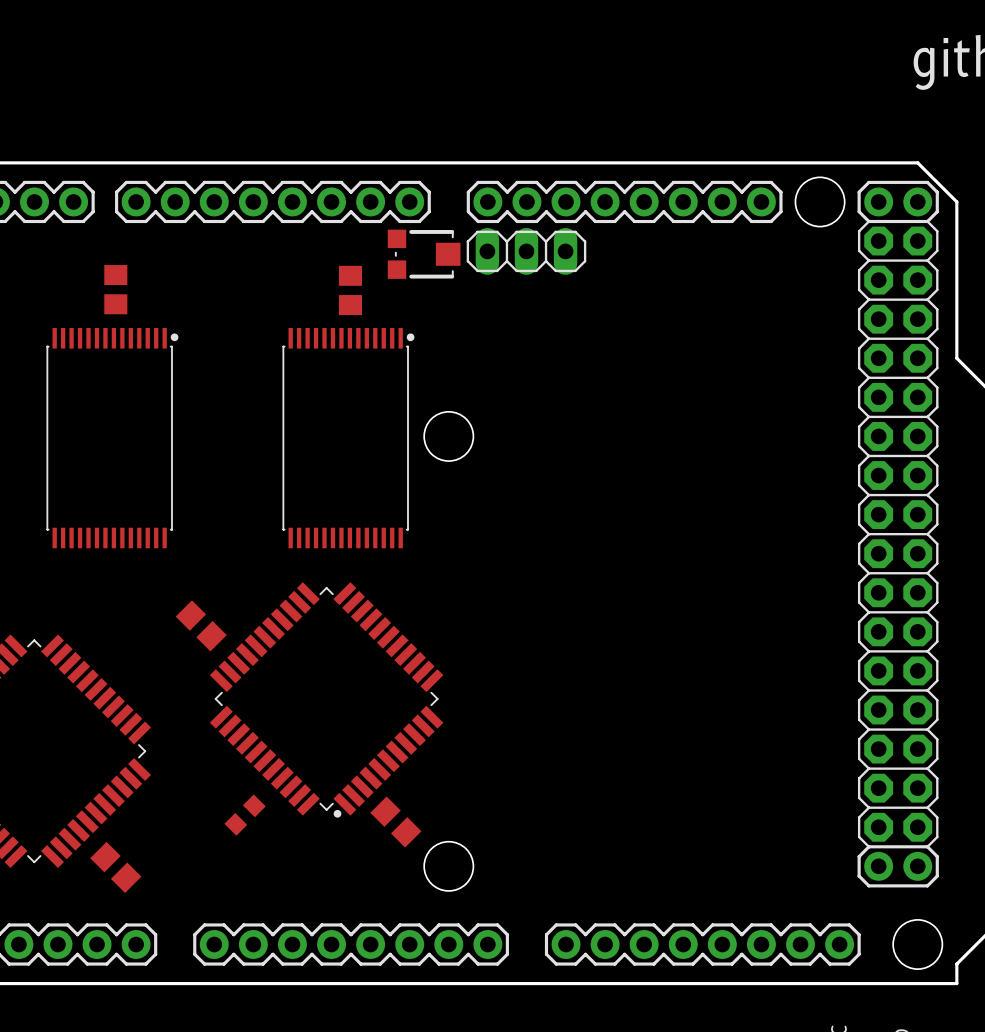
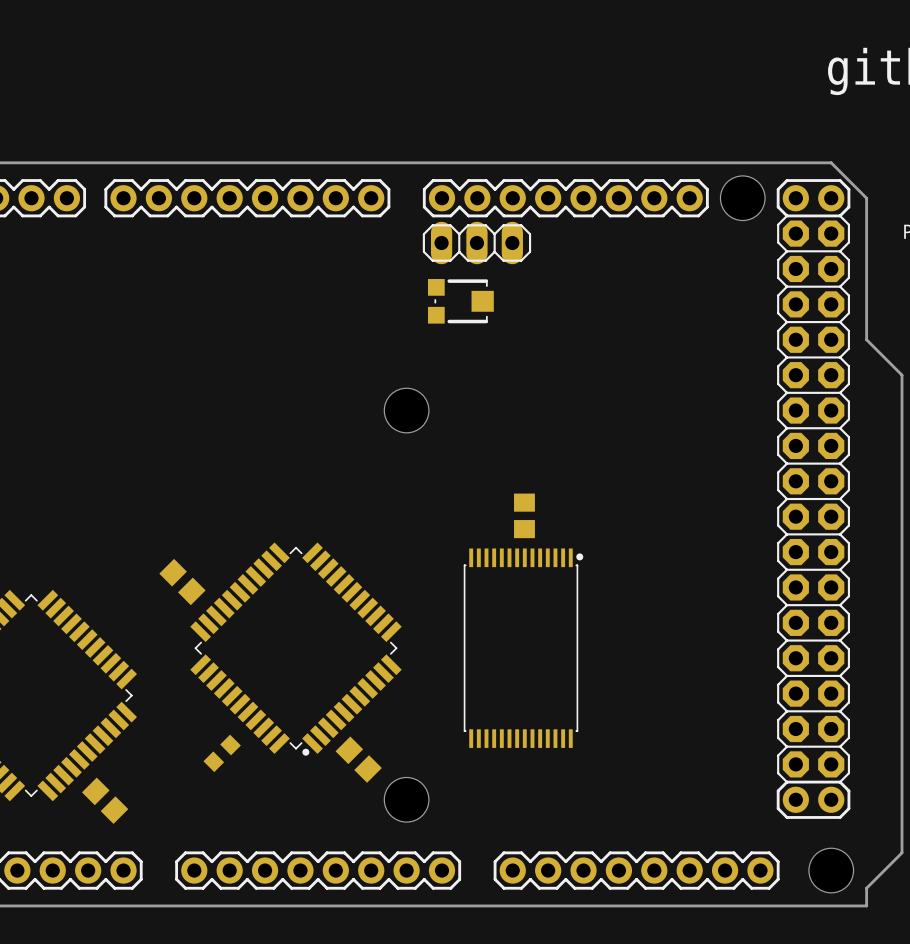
part position: (424, 254) -> (460, 301)
part: (115, 289) -> none
part: (350, 290) -> none
part: (112, 438) -> none
part: (348, 438) -> none
part: none -> (524, 515)
part: none -> (523, 648)

